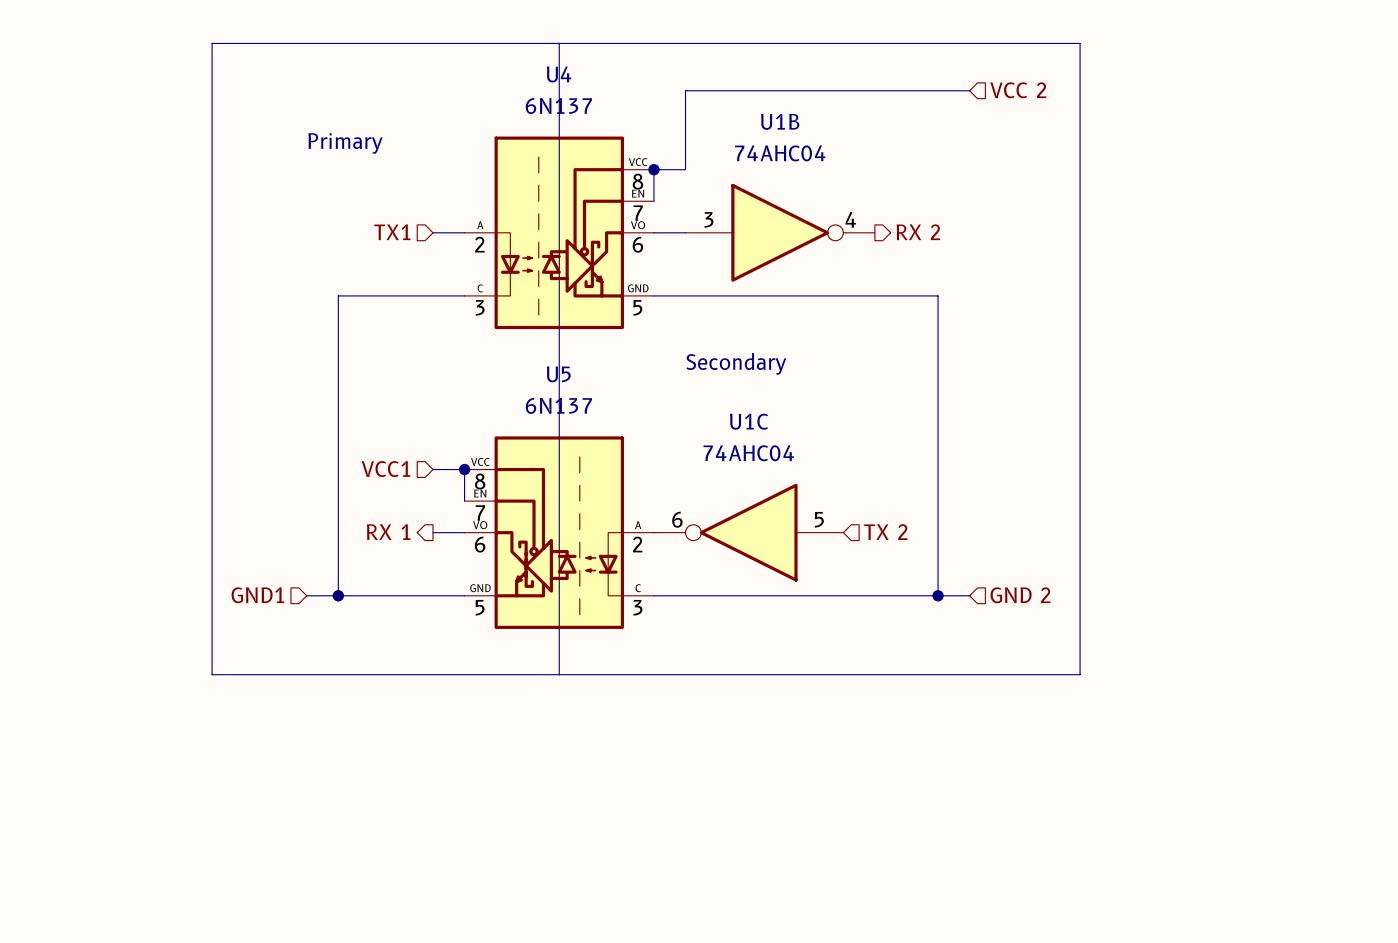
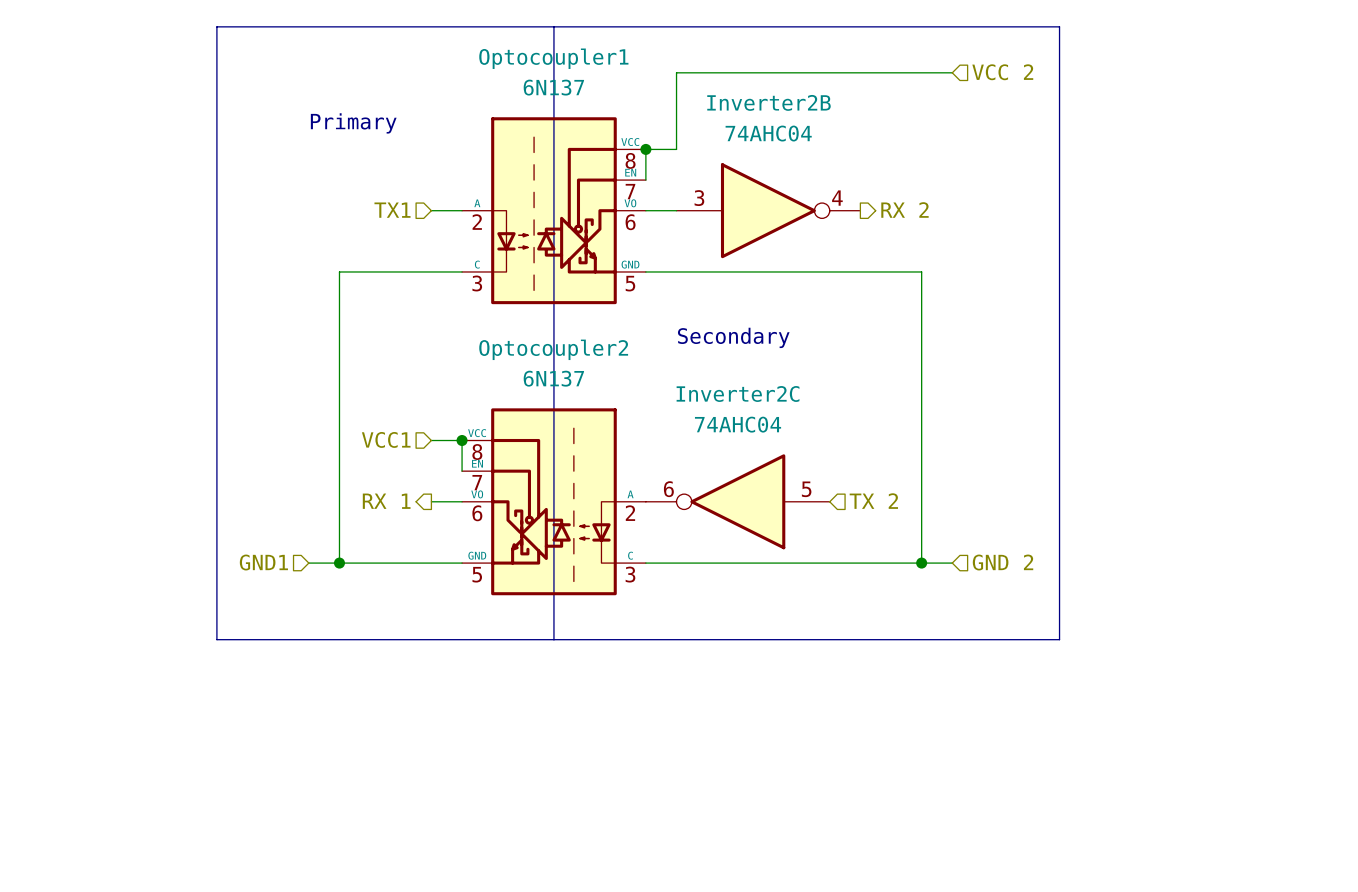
U4 name: U4 (559, 74) -> Optocoupler1 (553, 58)
U1B name: U1B (780, 121) -> Inverter2B (768, 102)
U5 name: U5 (558, 374) -> Optocoupler2 (553, 349)
U1C name: U1C (749, 421) -> Inverter2C (738, 393)

